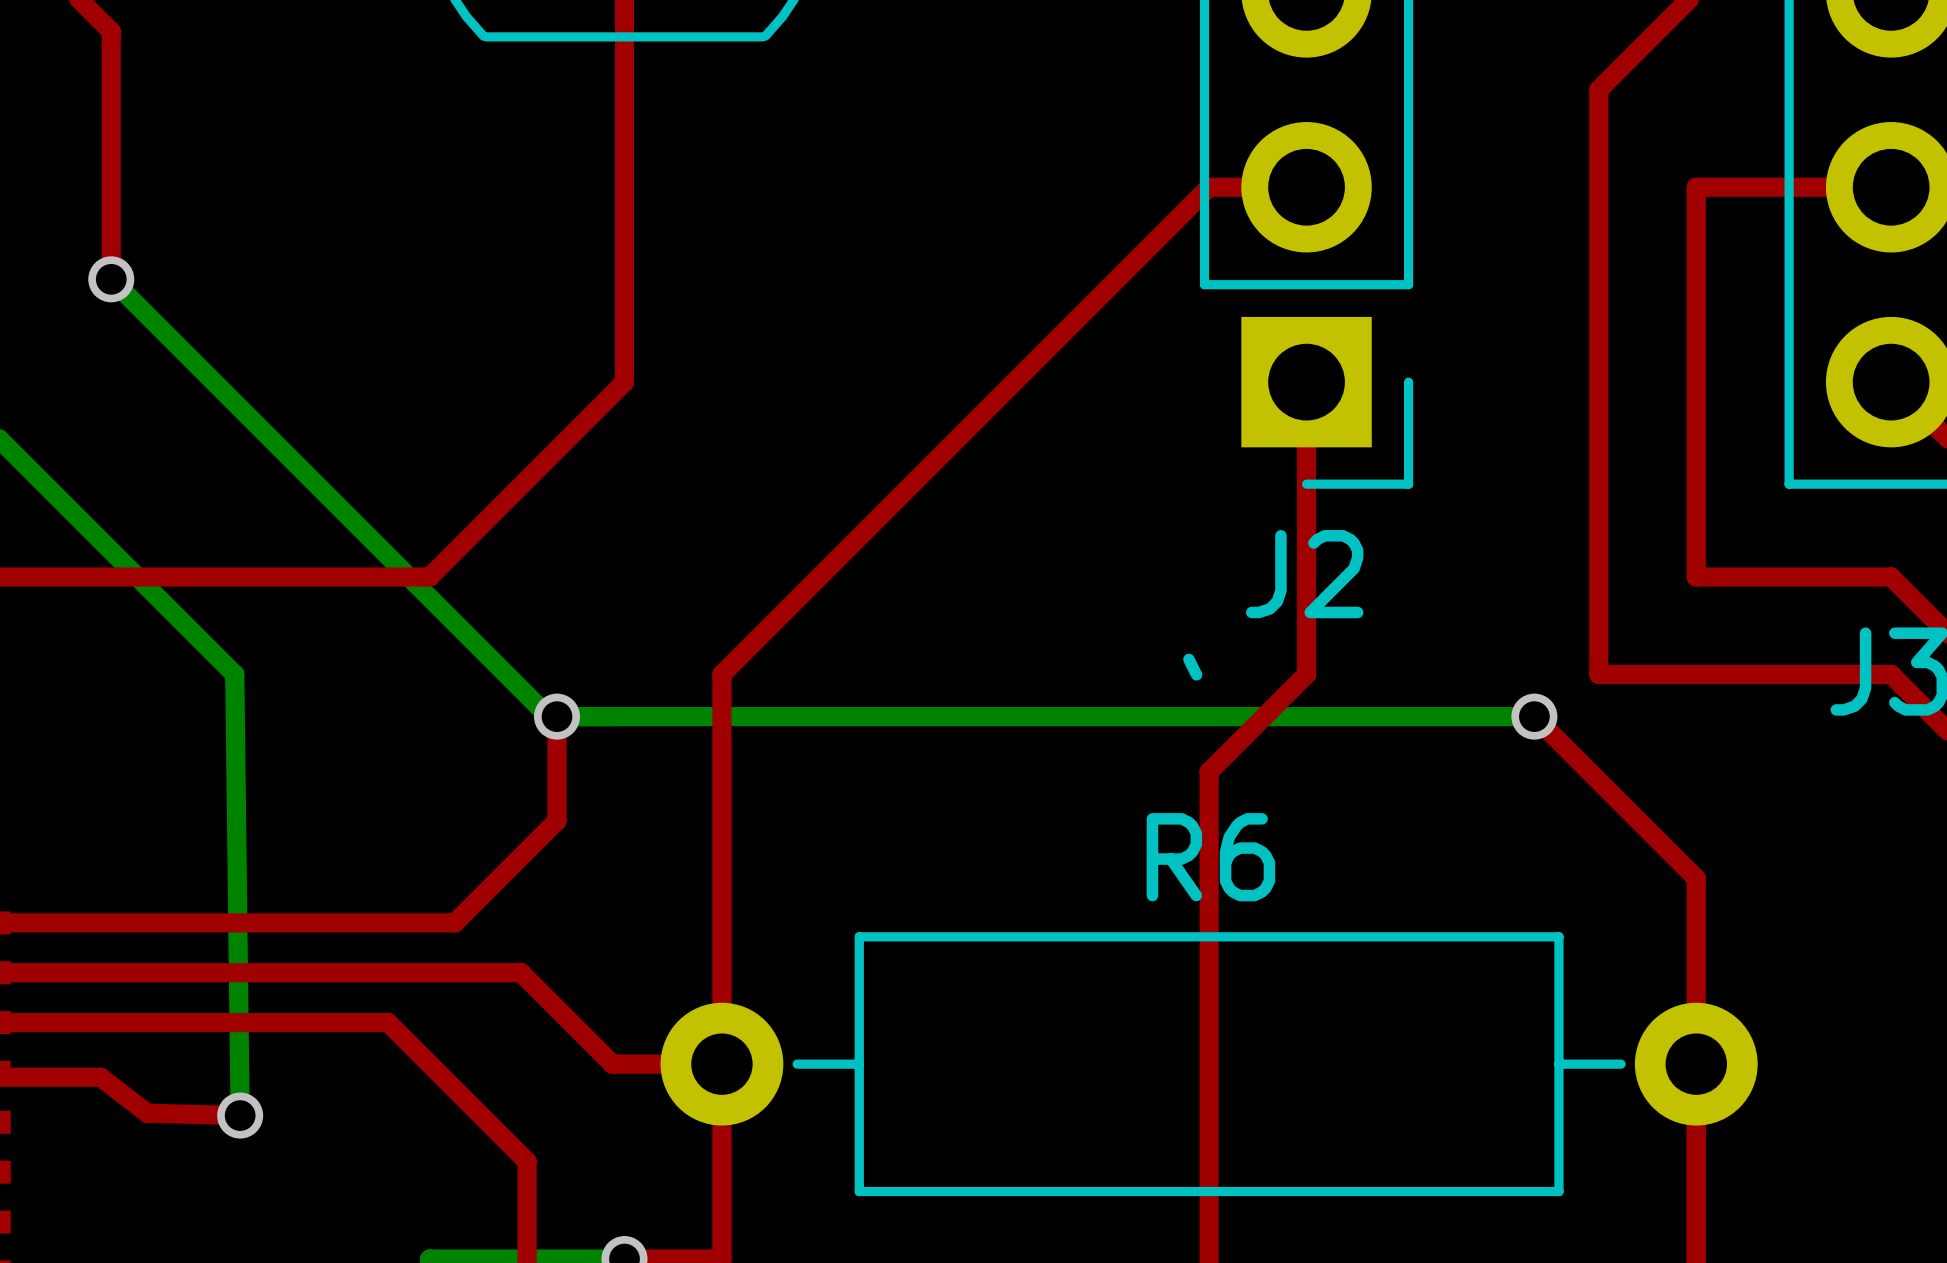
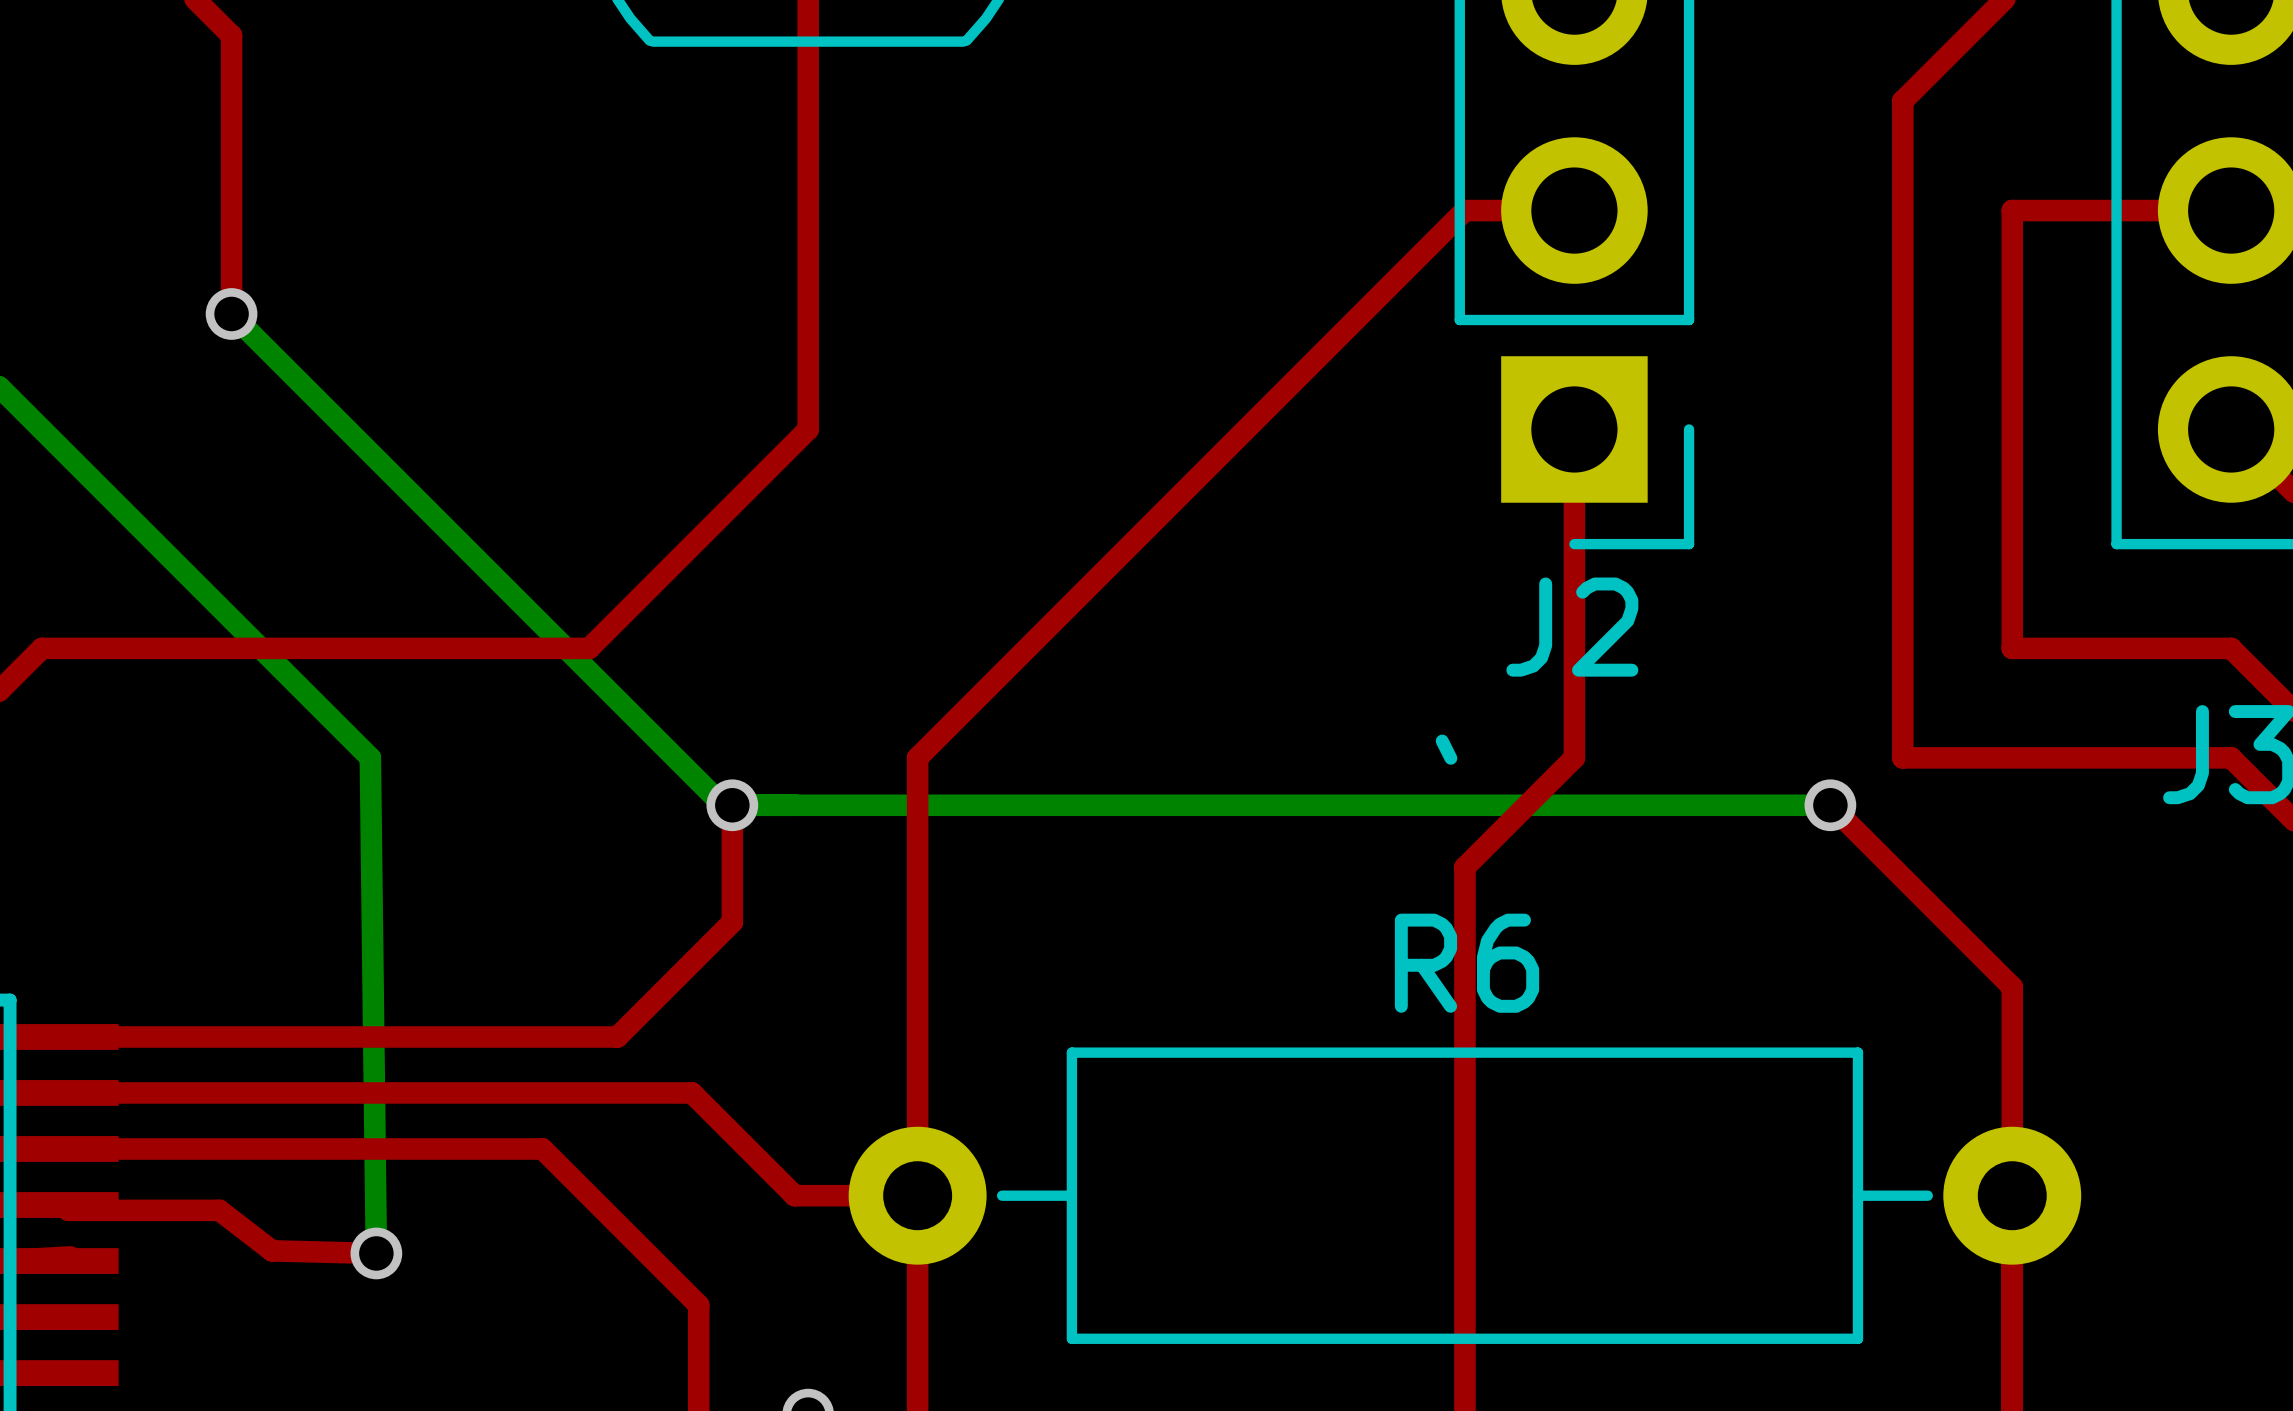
J2 name position: J2 (1304, 574) -> J2 (1572, 627)

